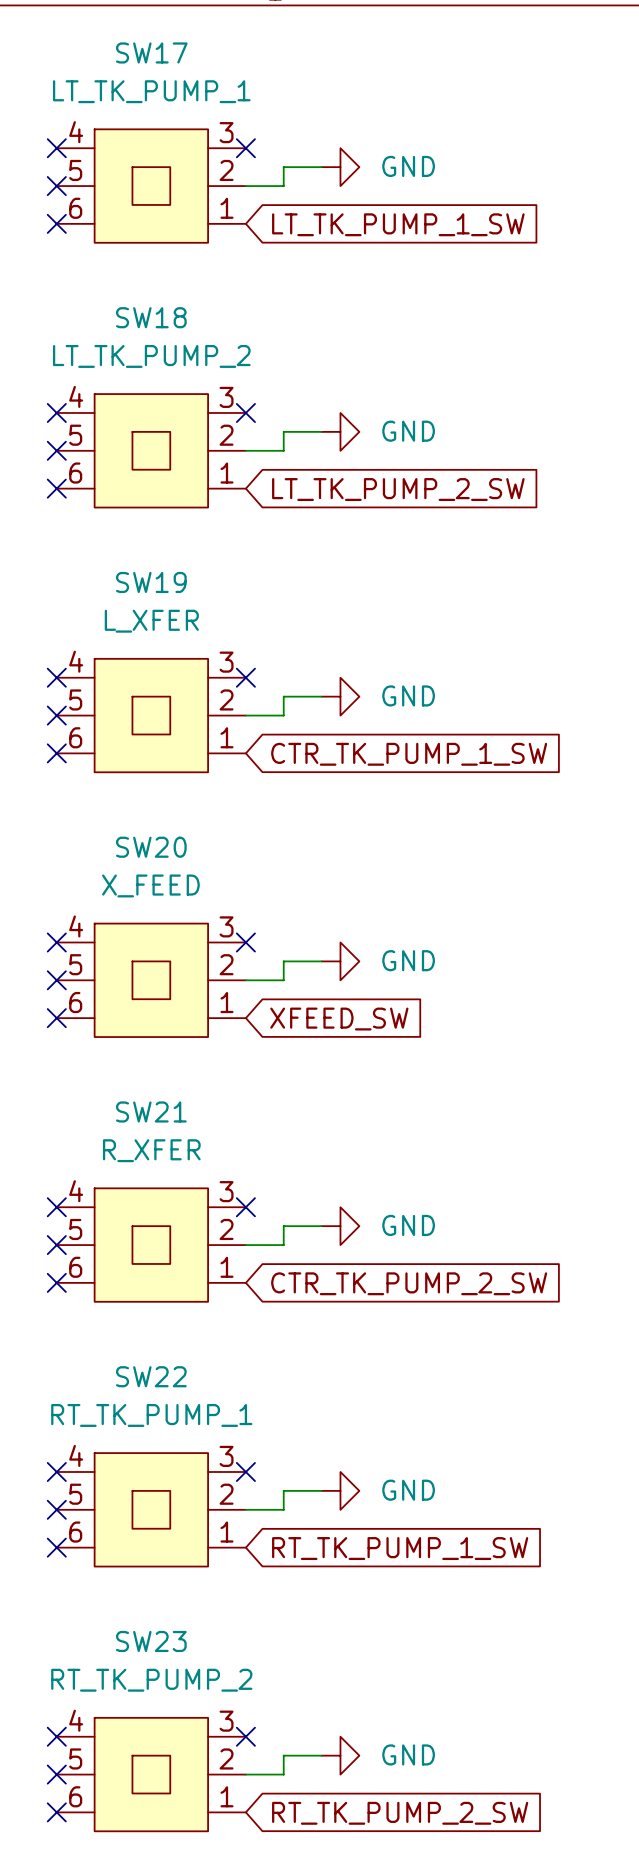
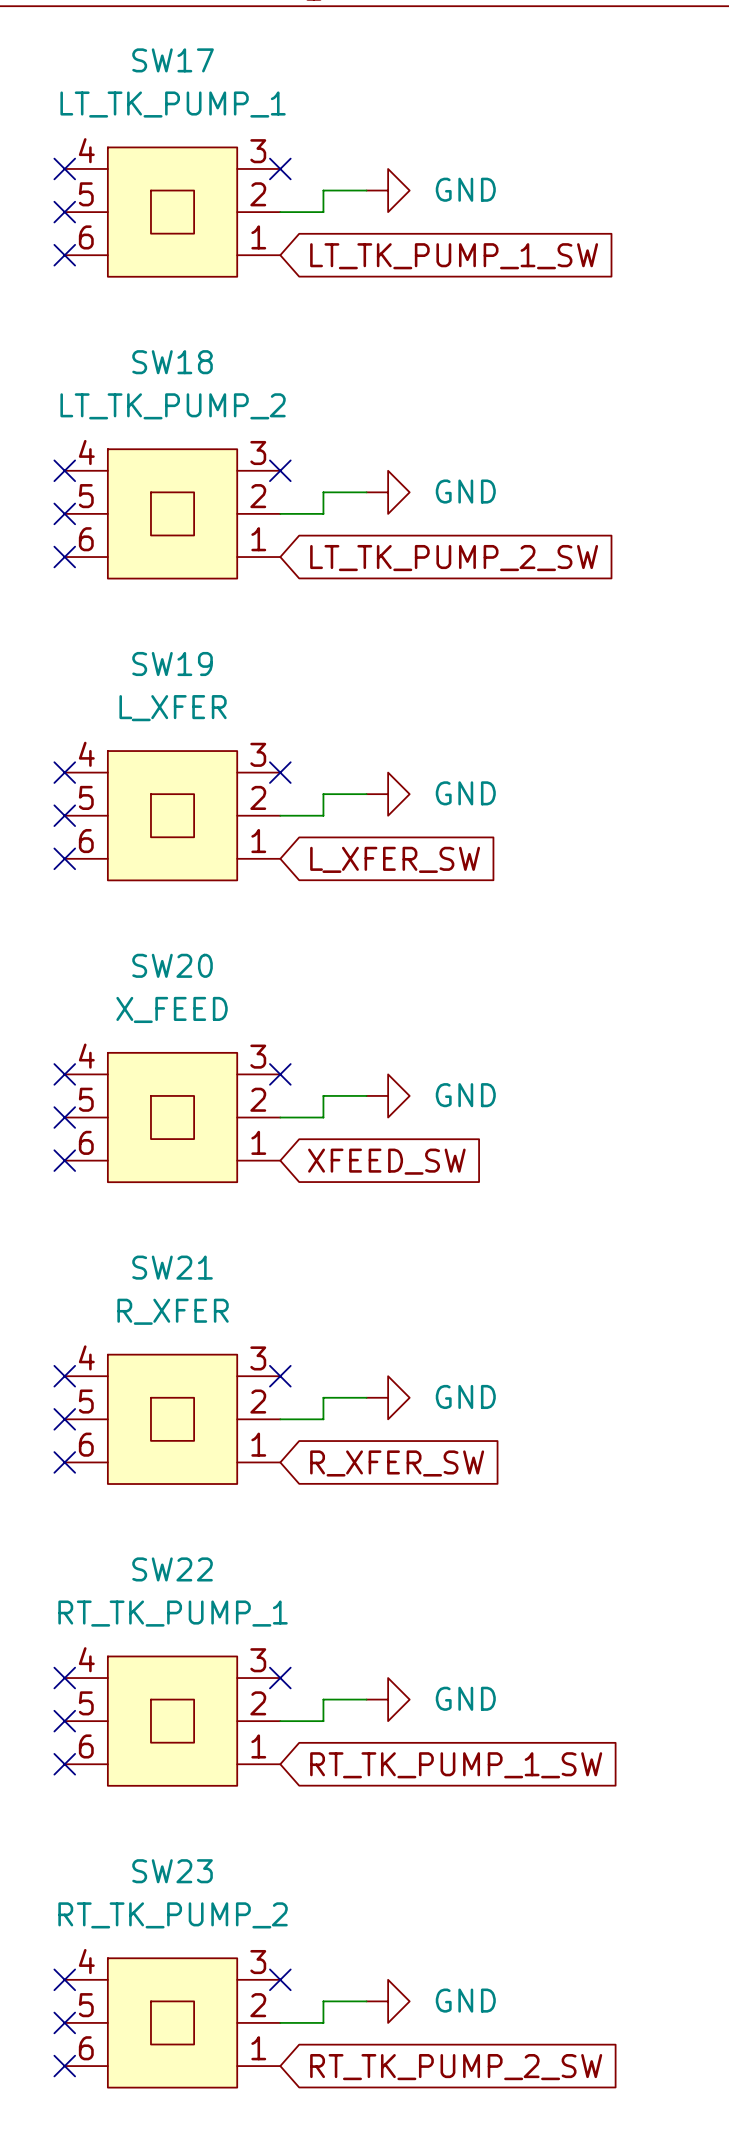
global label: CTR_TK_PUMP_1_SW (409, 754) -> L_XFER_SW (395, 859)
global label: CTR_TK_PUMP_2_SW (409, 1283) -> R_XFER_SW (397, 1463)

